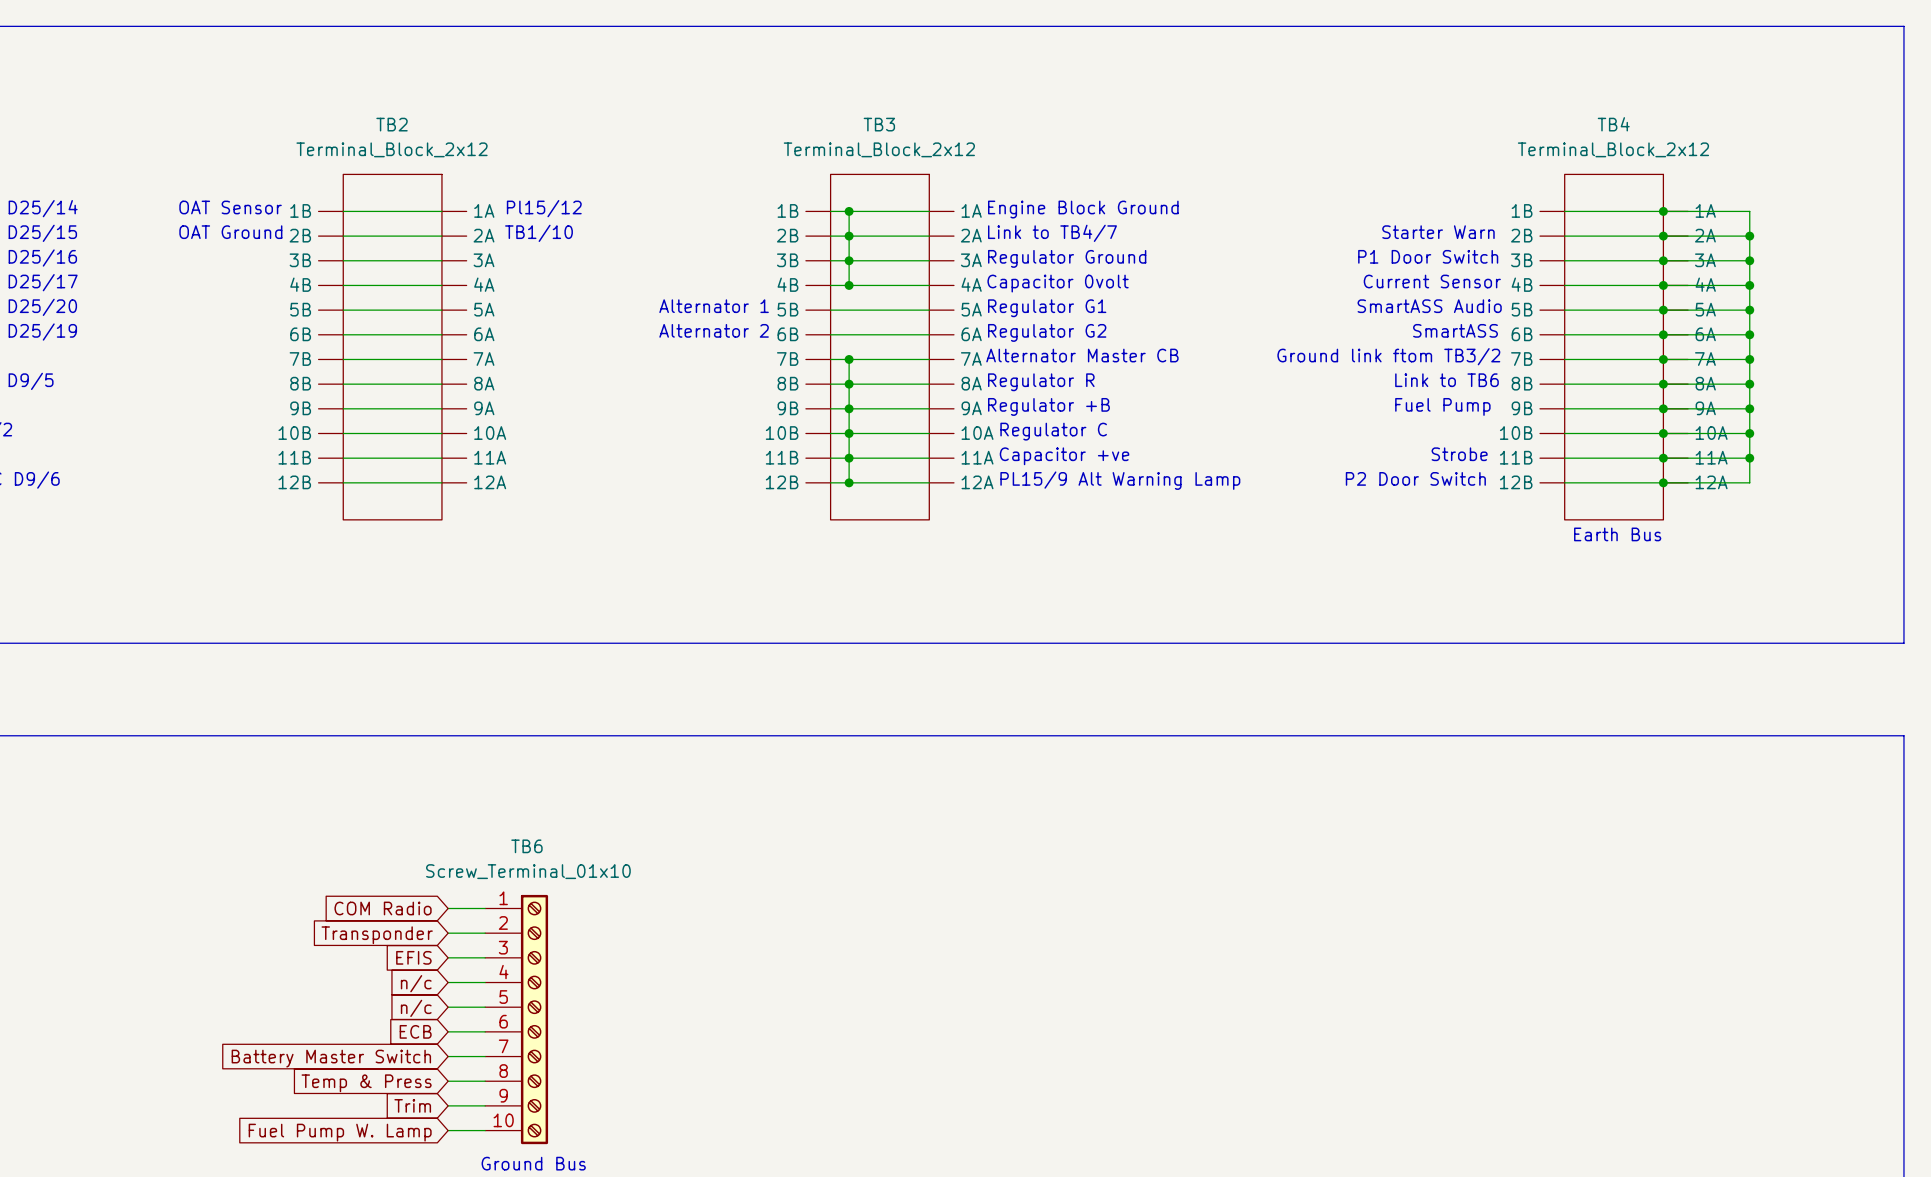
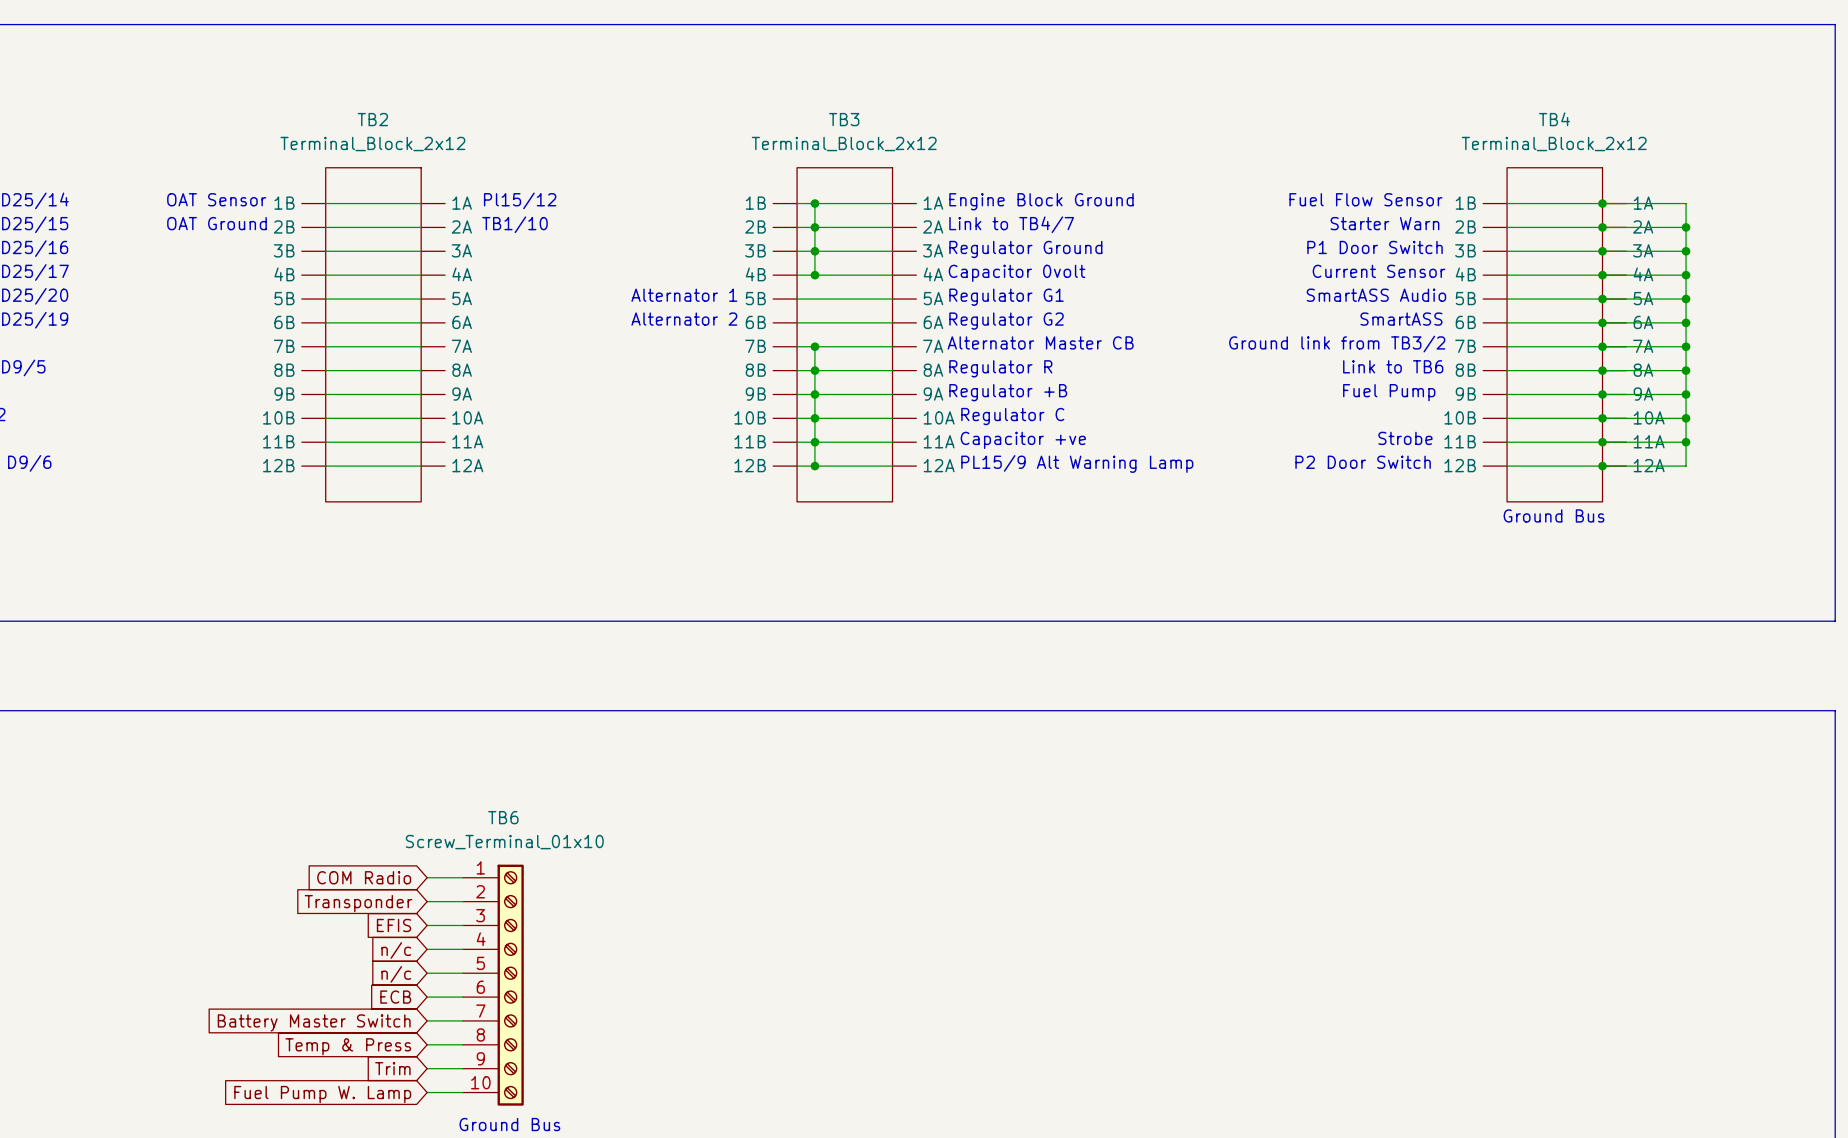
text: none -> Fuel Flow Sensor (1365, 199)
text: Ground link ftom TB3/2 (1388, 356) -> Ground link from TB3/2 (1337, 344)
text: none -> Ground Bus (1554, 515)
text: Earth Bus (1617, 534) -> none

